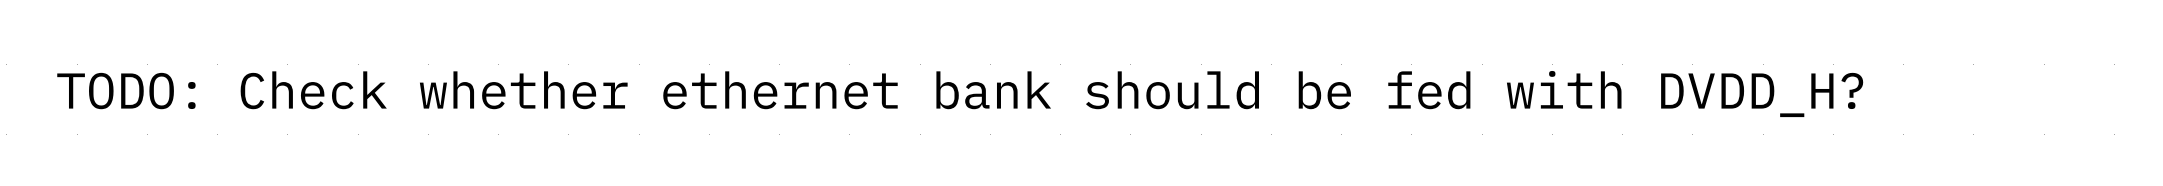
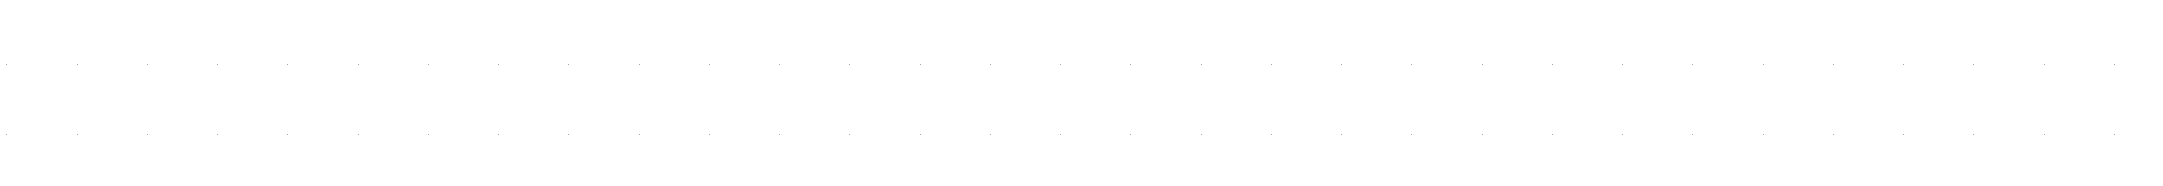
text: TODO: Check whether ethernet bank should be fed with DVDD_H? (960, 94) -> none

